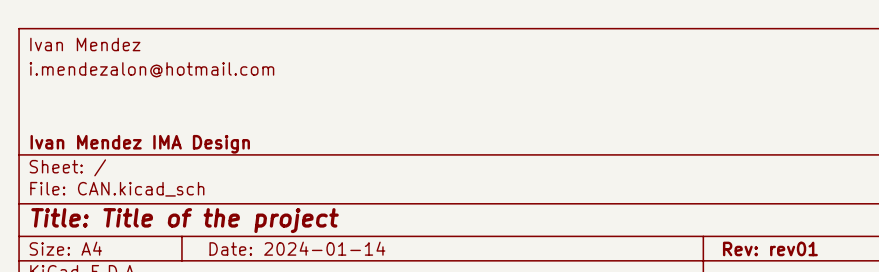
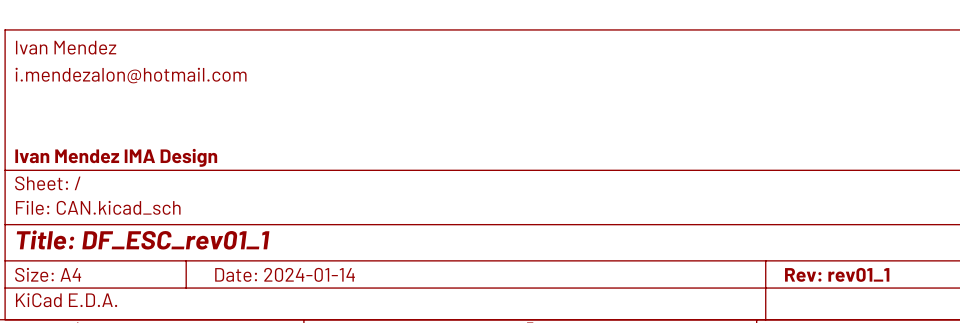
title block: Title: Title of the project (185, 220) -> Title: DF_ESC_rev01_1 (143, 240)
title block: Rev: rev01 (770, 248) -> Rev: rev01_1 (837, 274)

